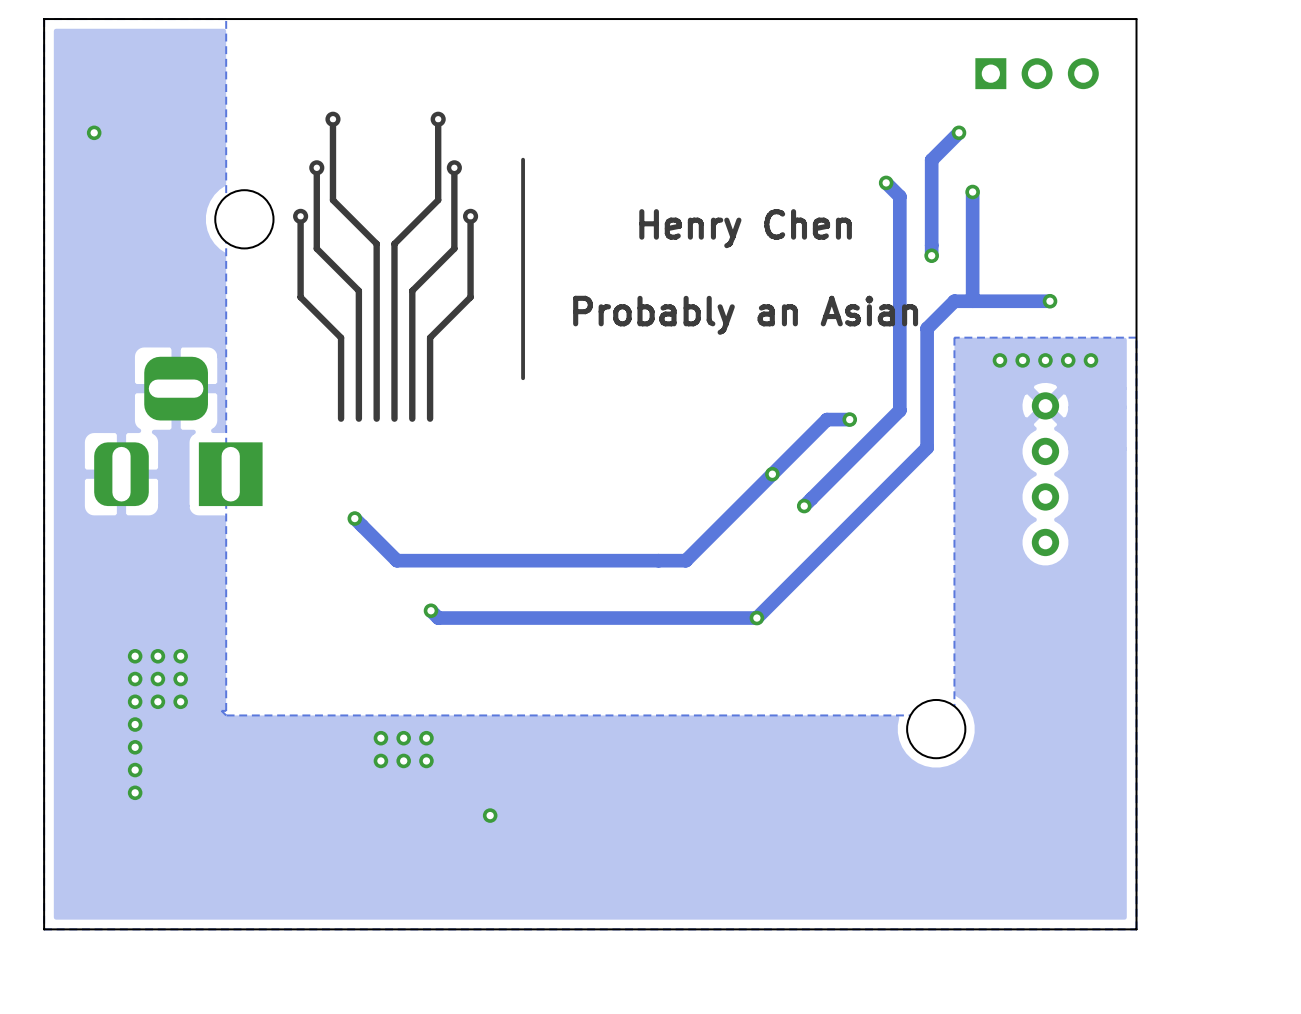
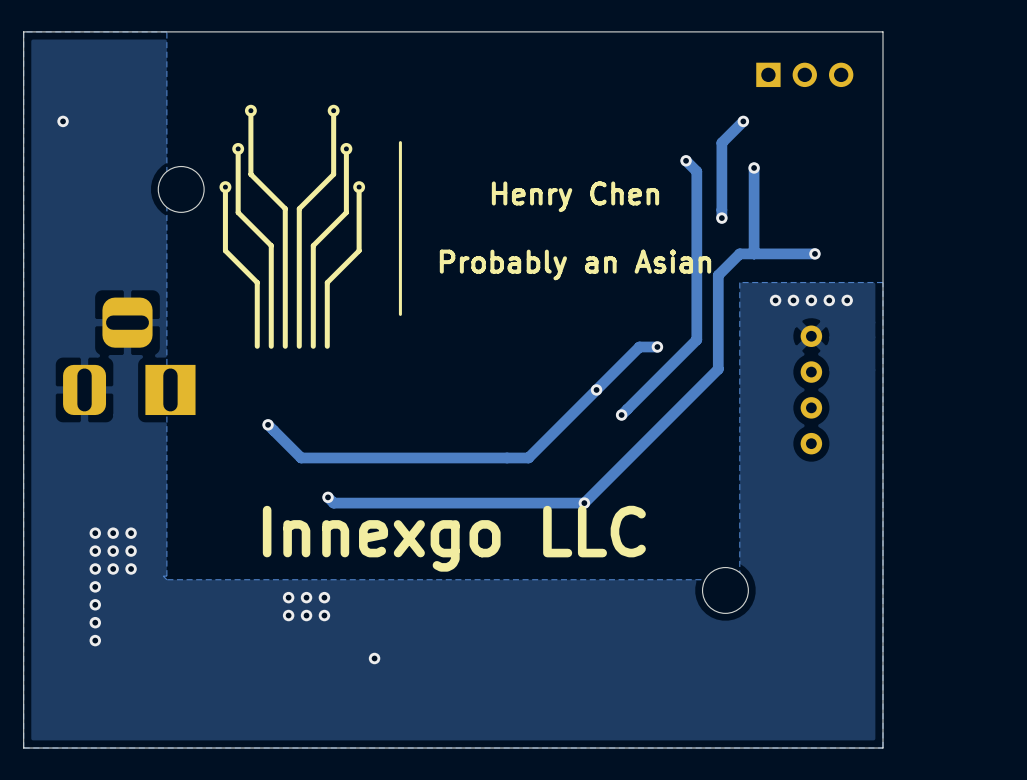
text: none -> Innexgo LLC (454, 538)

